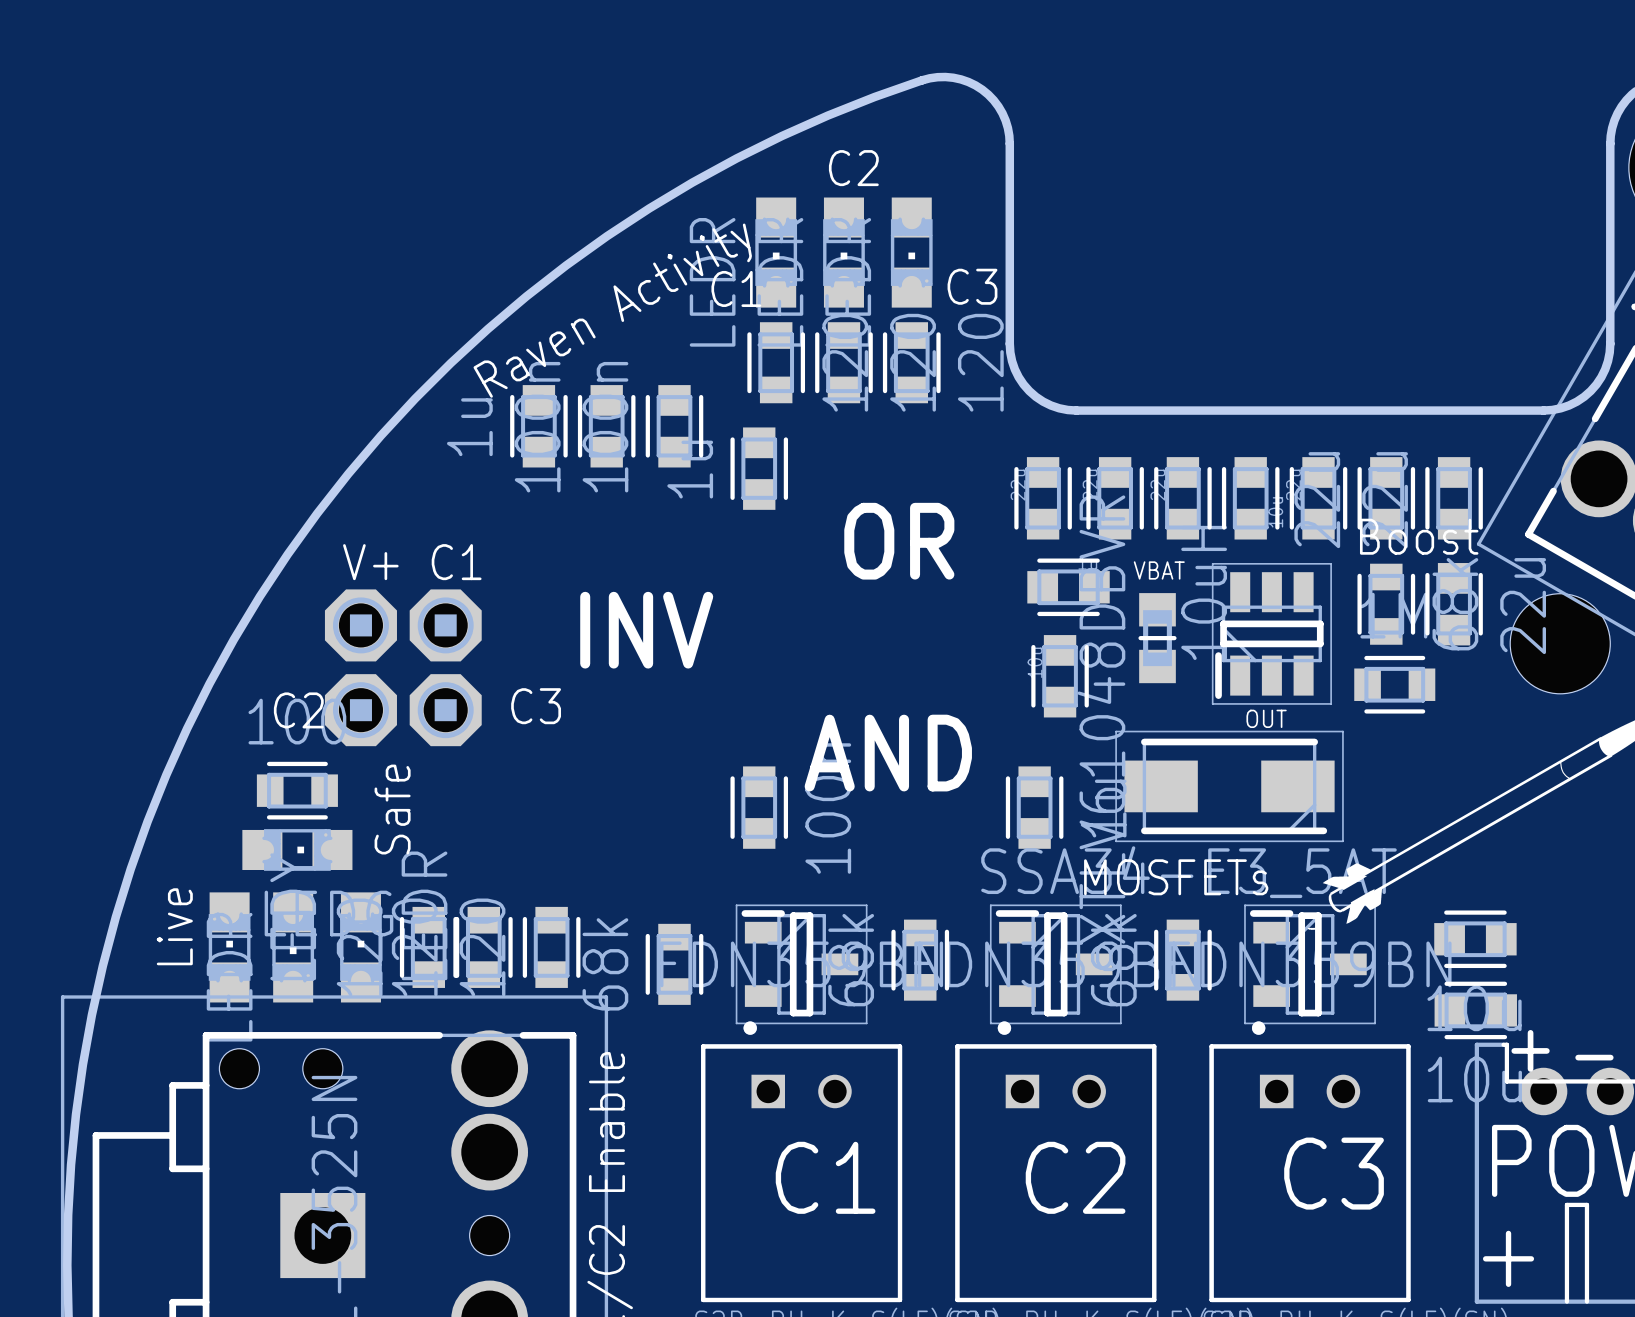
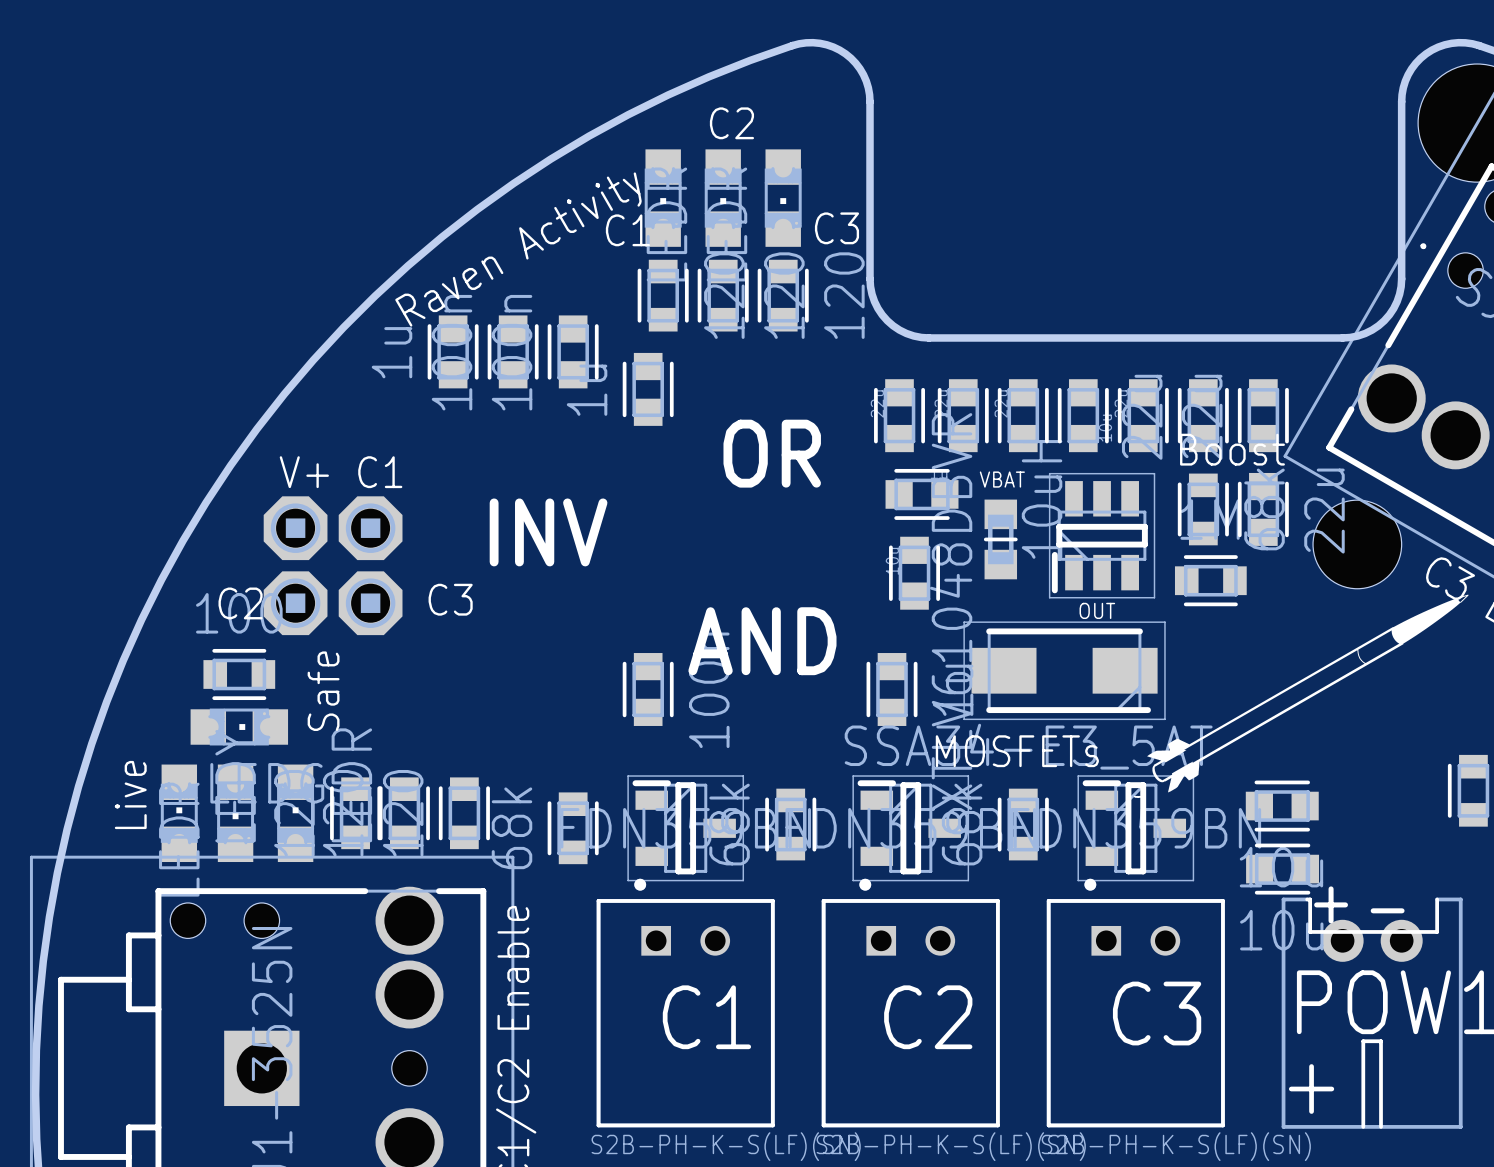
part value: LEDR (712, 282) -> none

